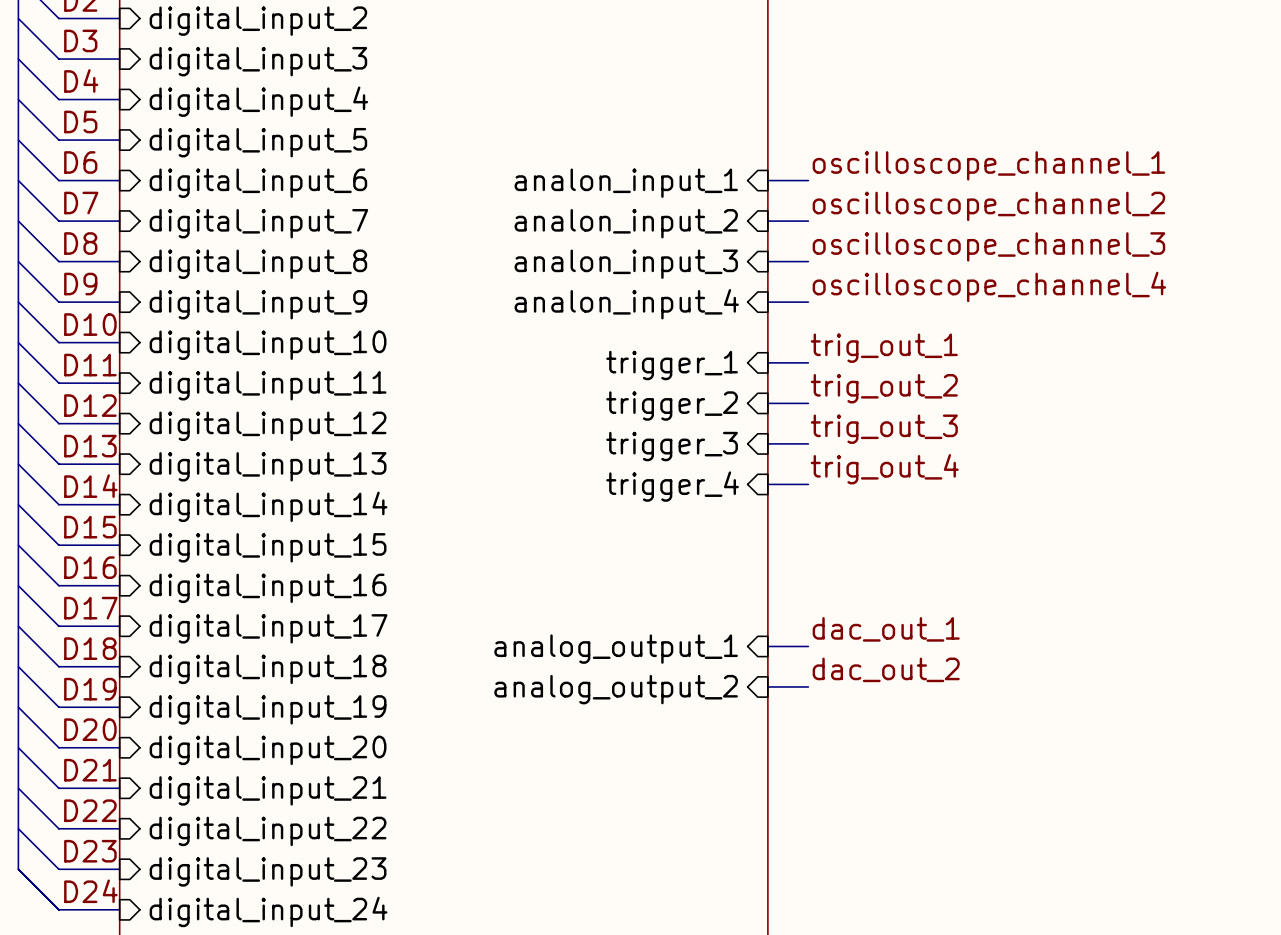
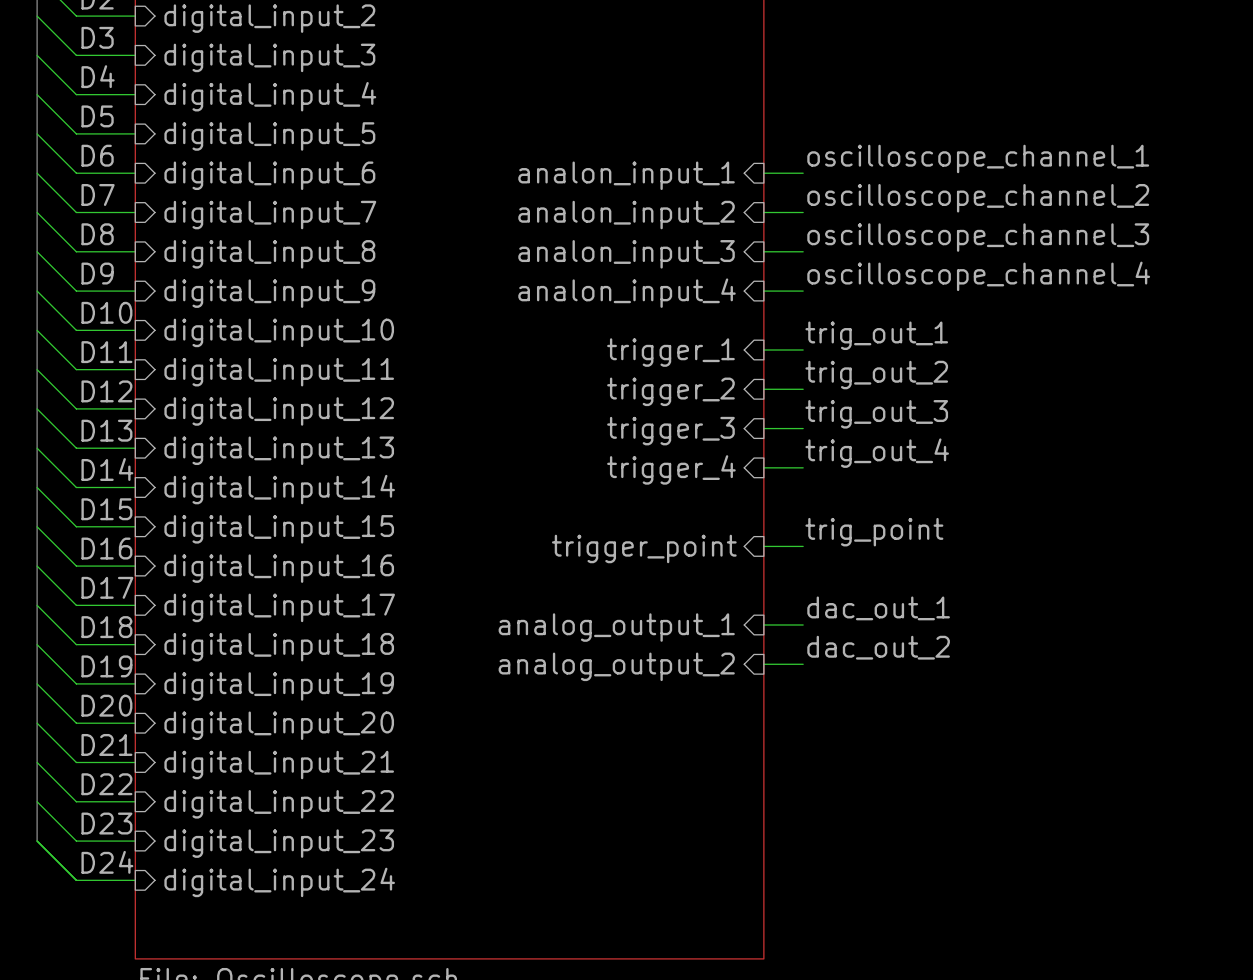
label: none -> trig_point (874, 532)
wire: none -> (763, 546) (803, 546)
sheet pin: none -> trigger_point (644, 548)

